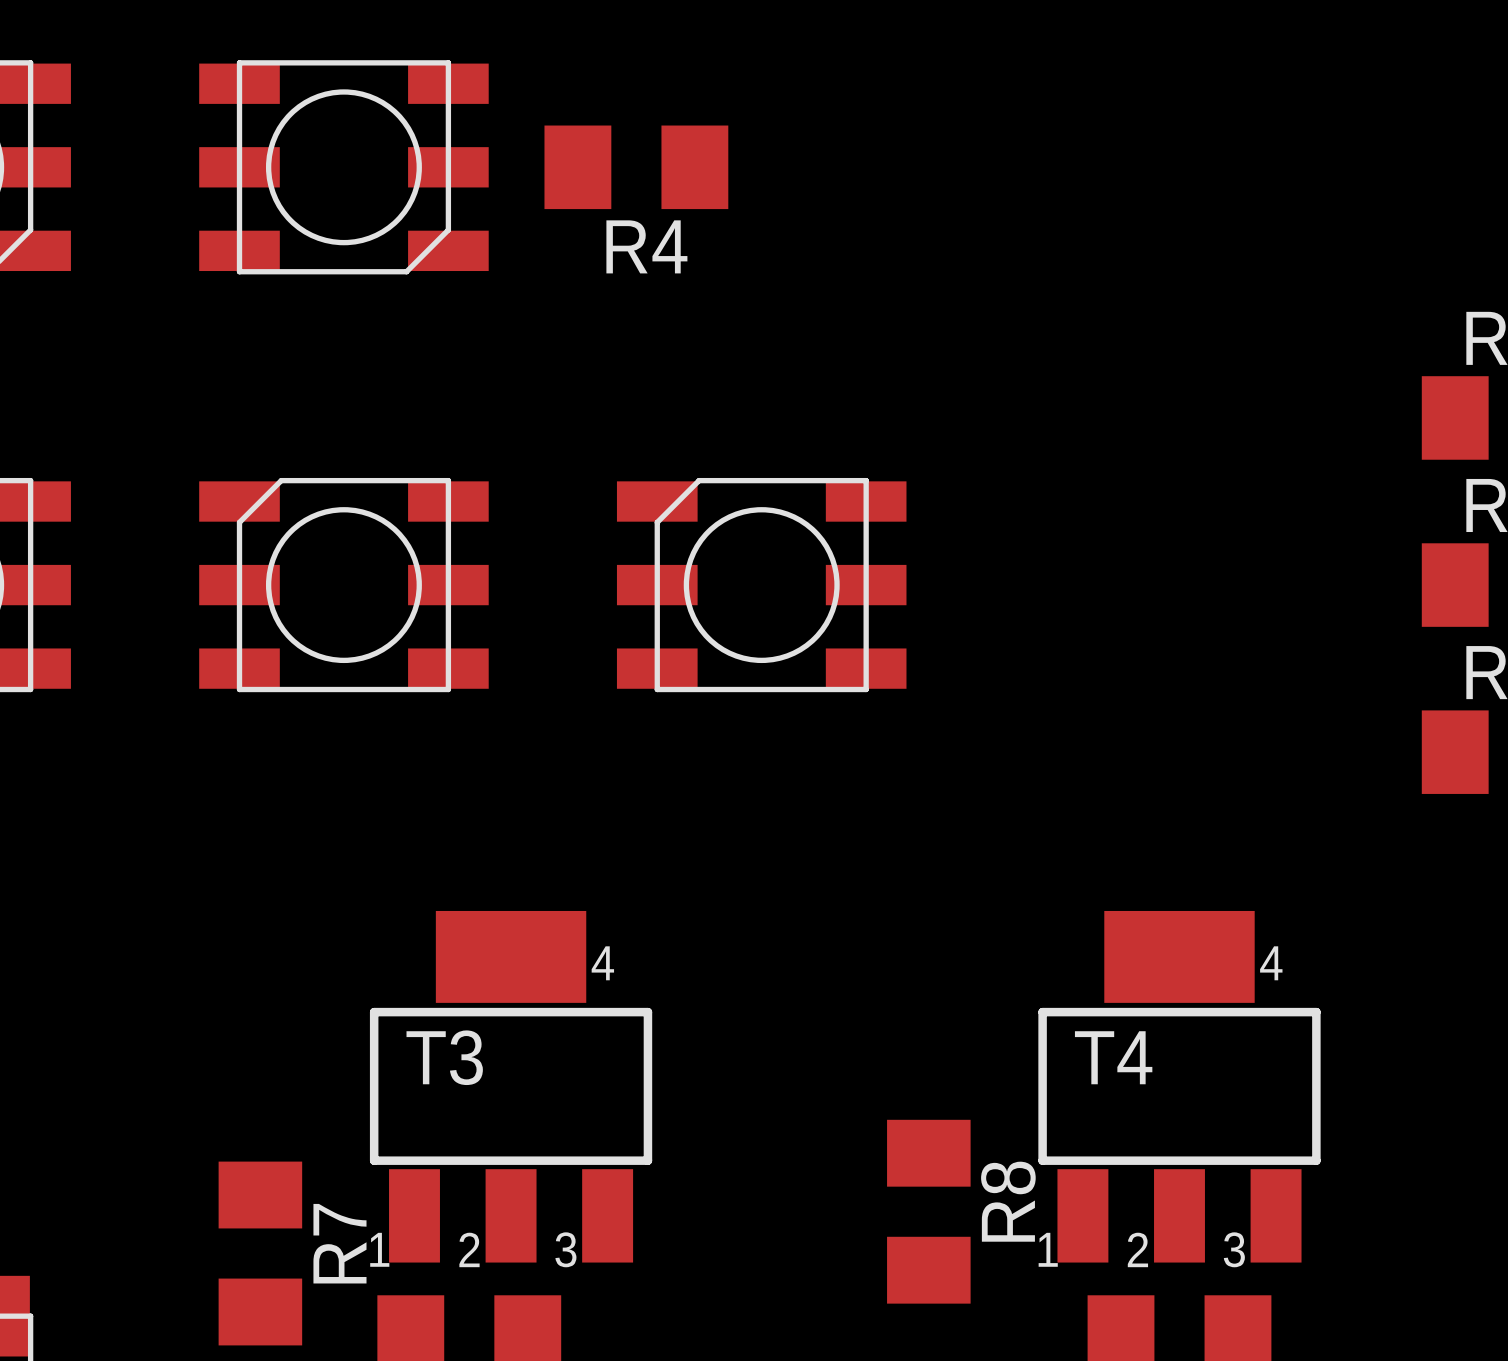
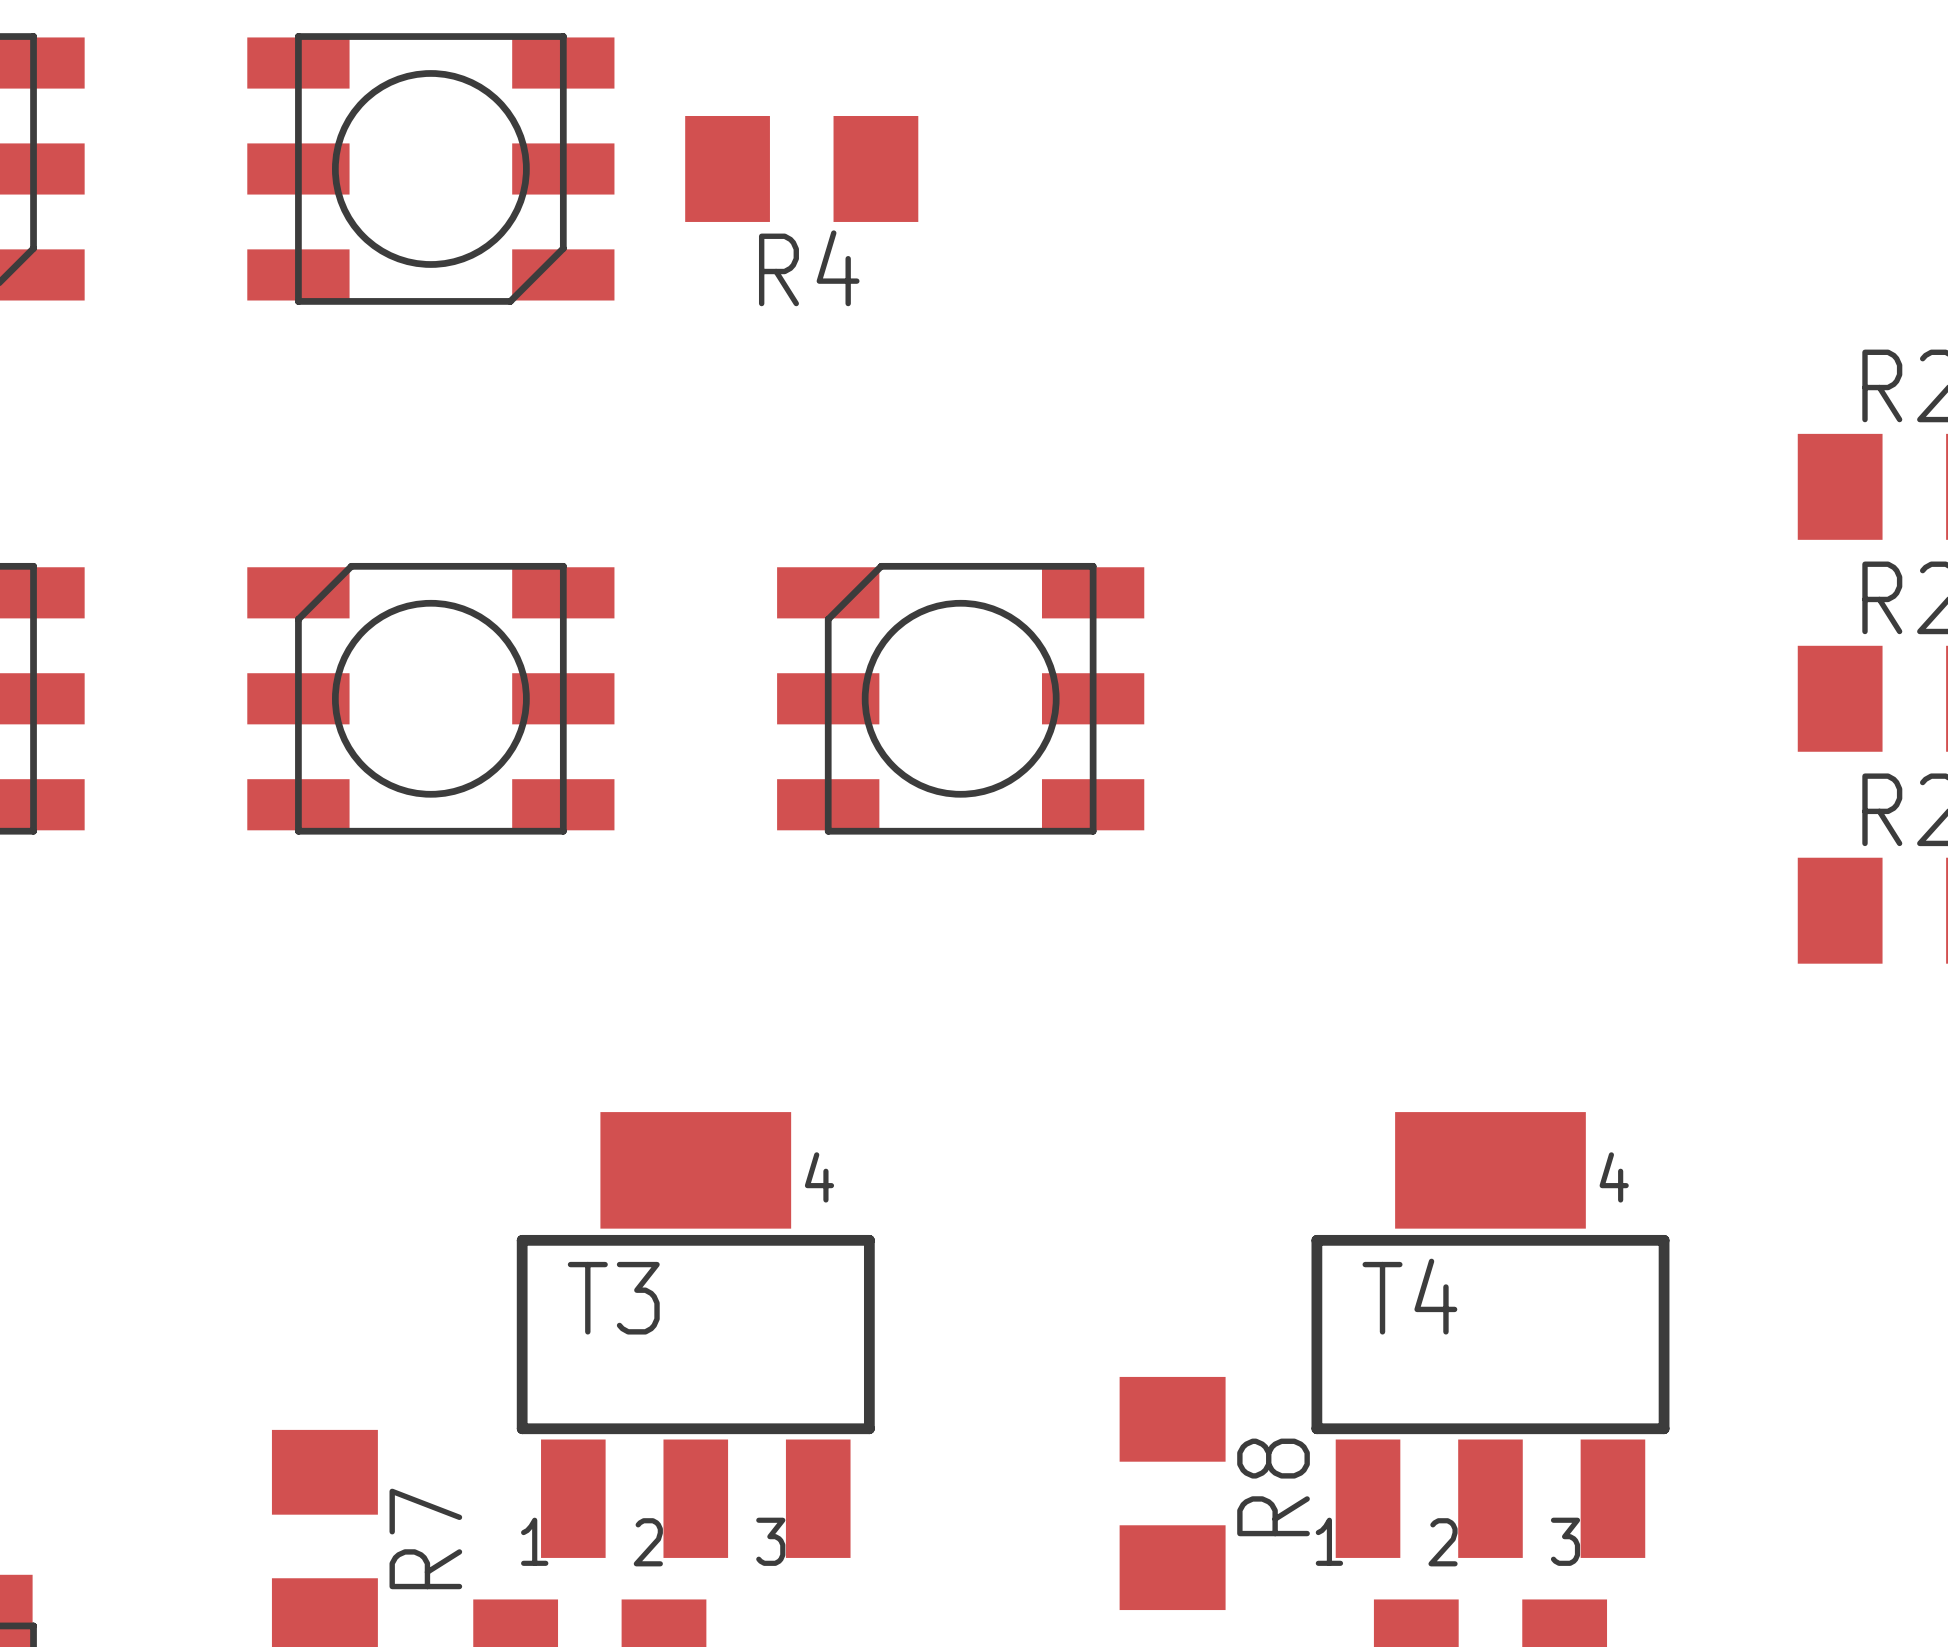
T3 position: (511, 1086) -> (695, 1335)

